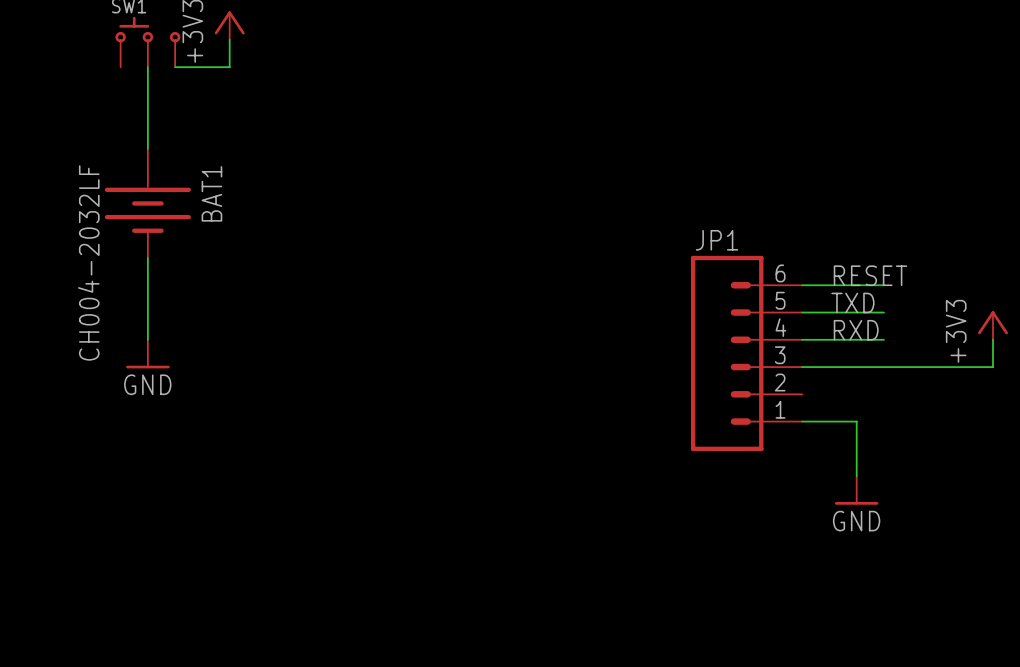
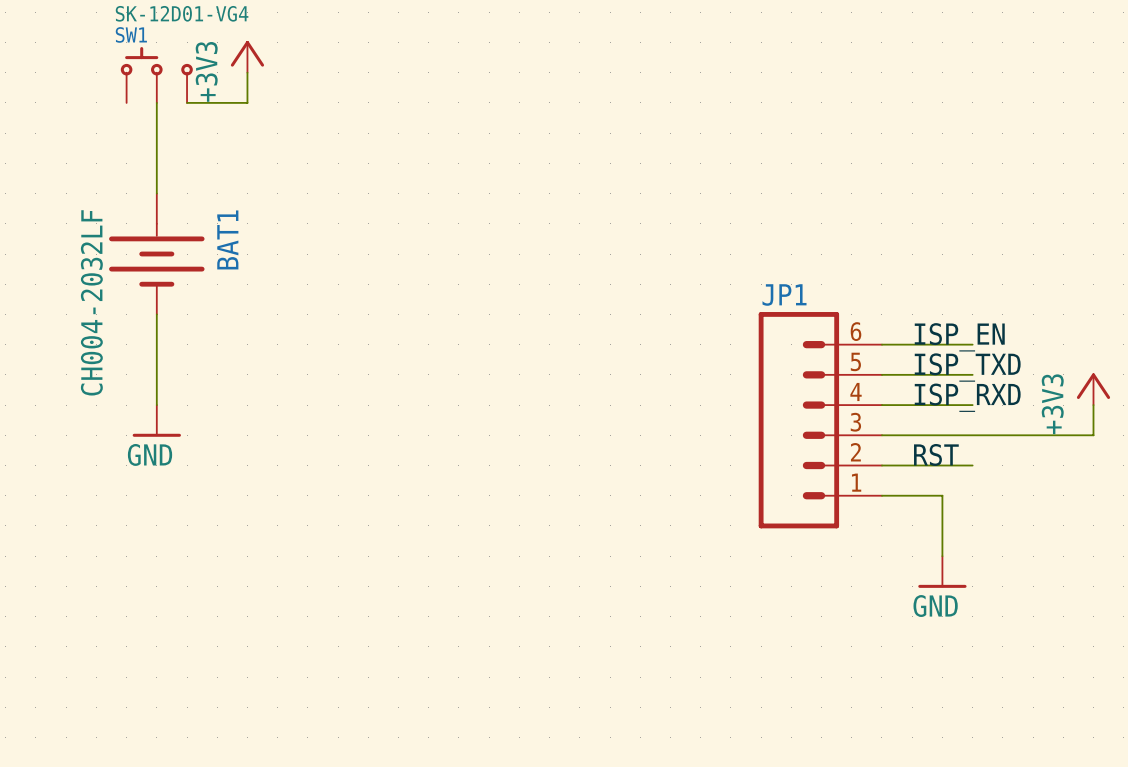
label: RESET (870, 275) -> ISP_EN (959, 337)
label: TXD (852, 302) -> ISP_TXD (967, 367)
label: RXD (856, 330) -> ISP_RXD (967, 397)
label: none -> RST (936, 454)
wire: none -> (881, 465) (972, 465)

